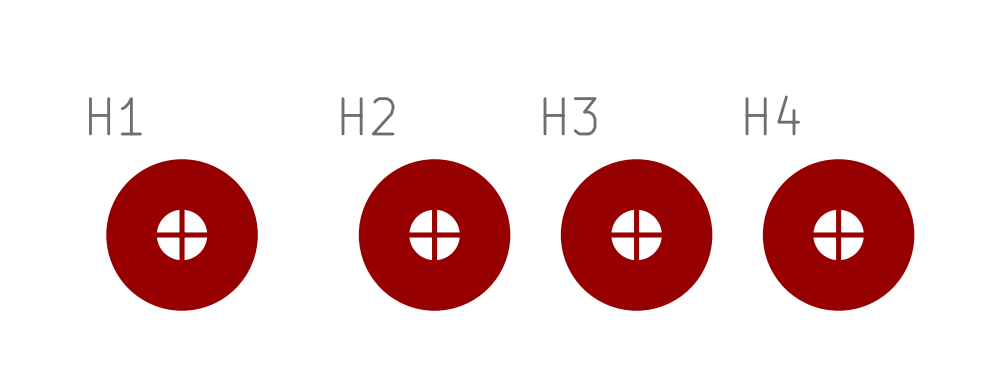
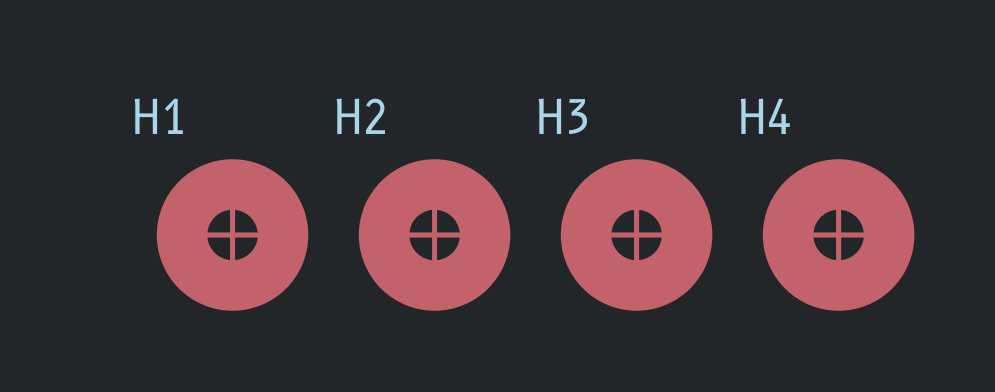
H1 position: (182, 234) -> (232, 234)

